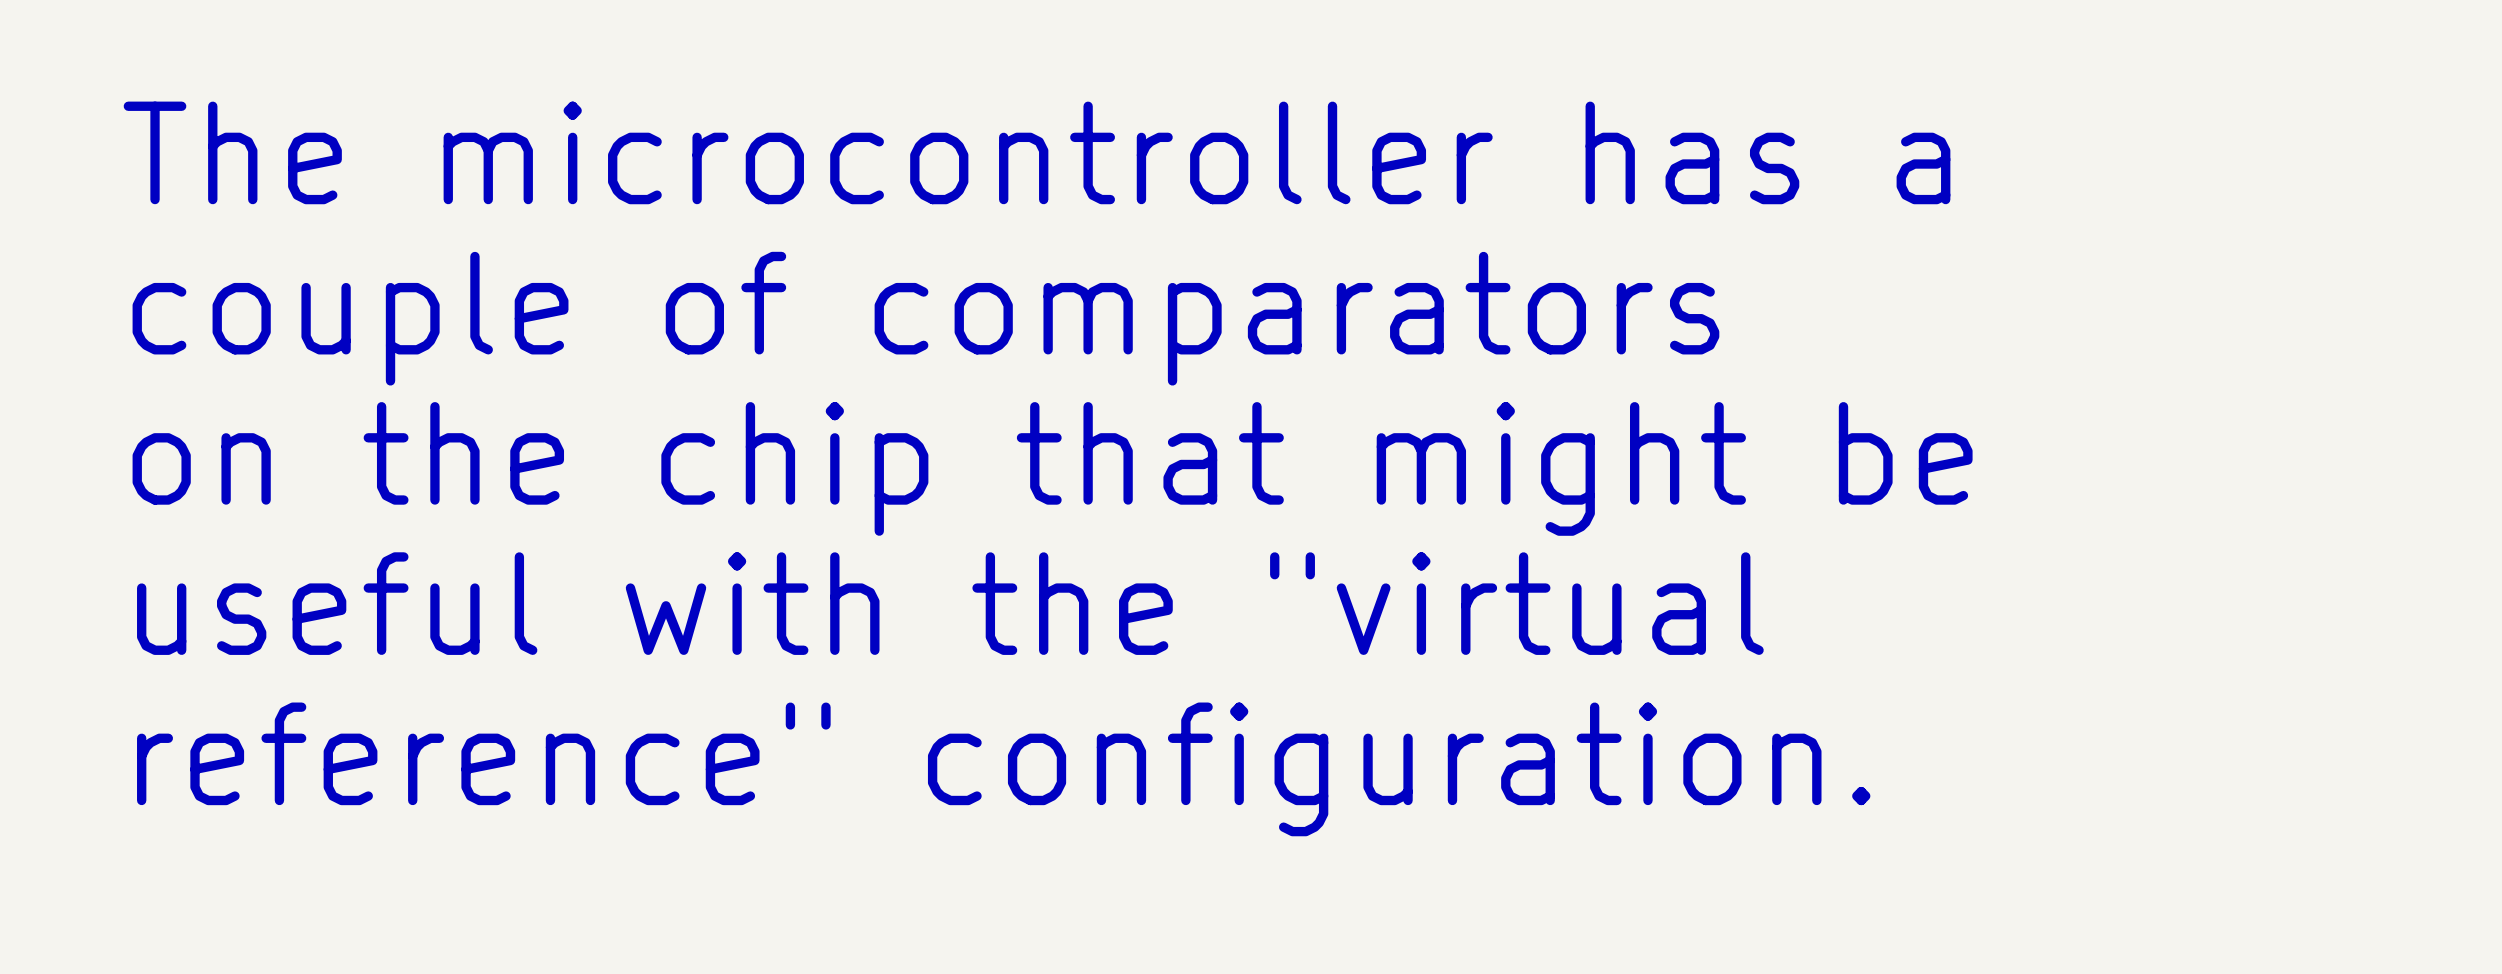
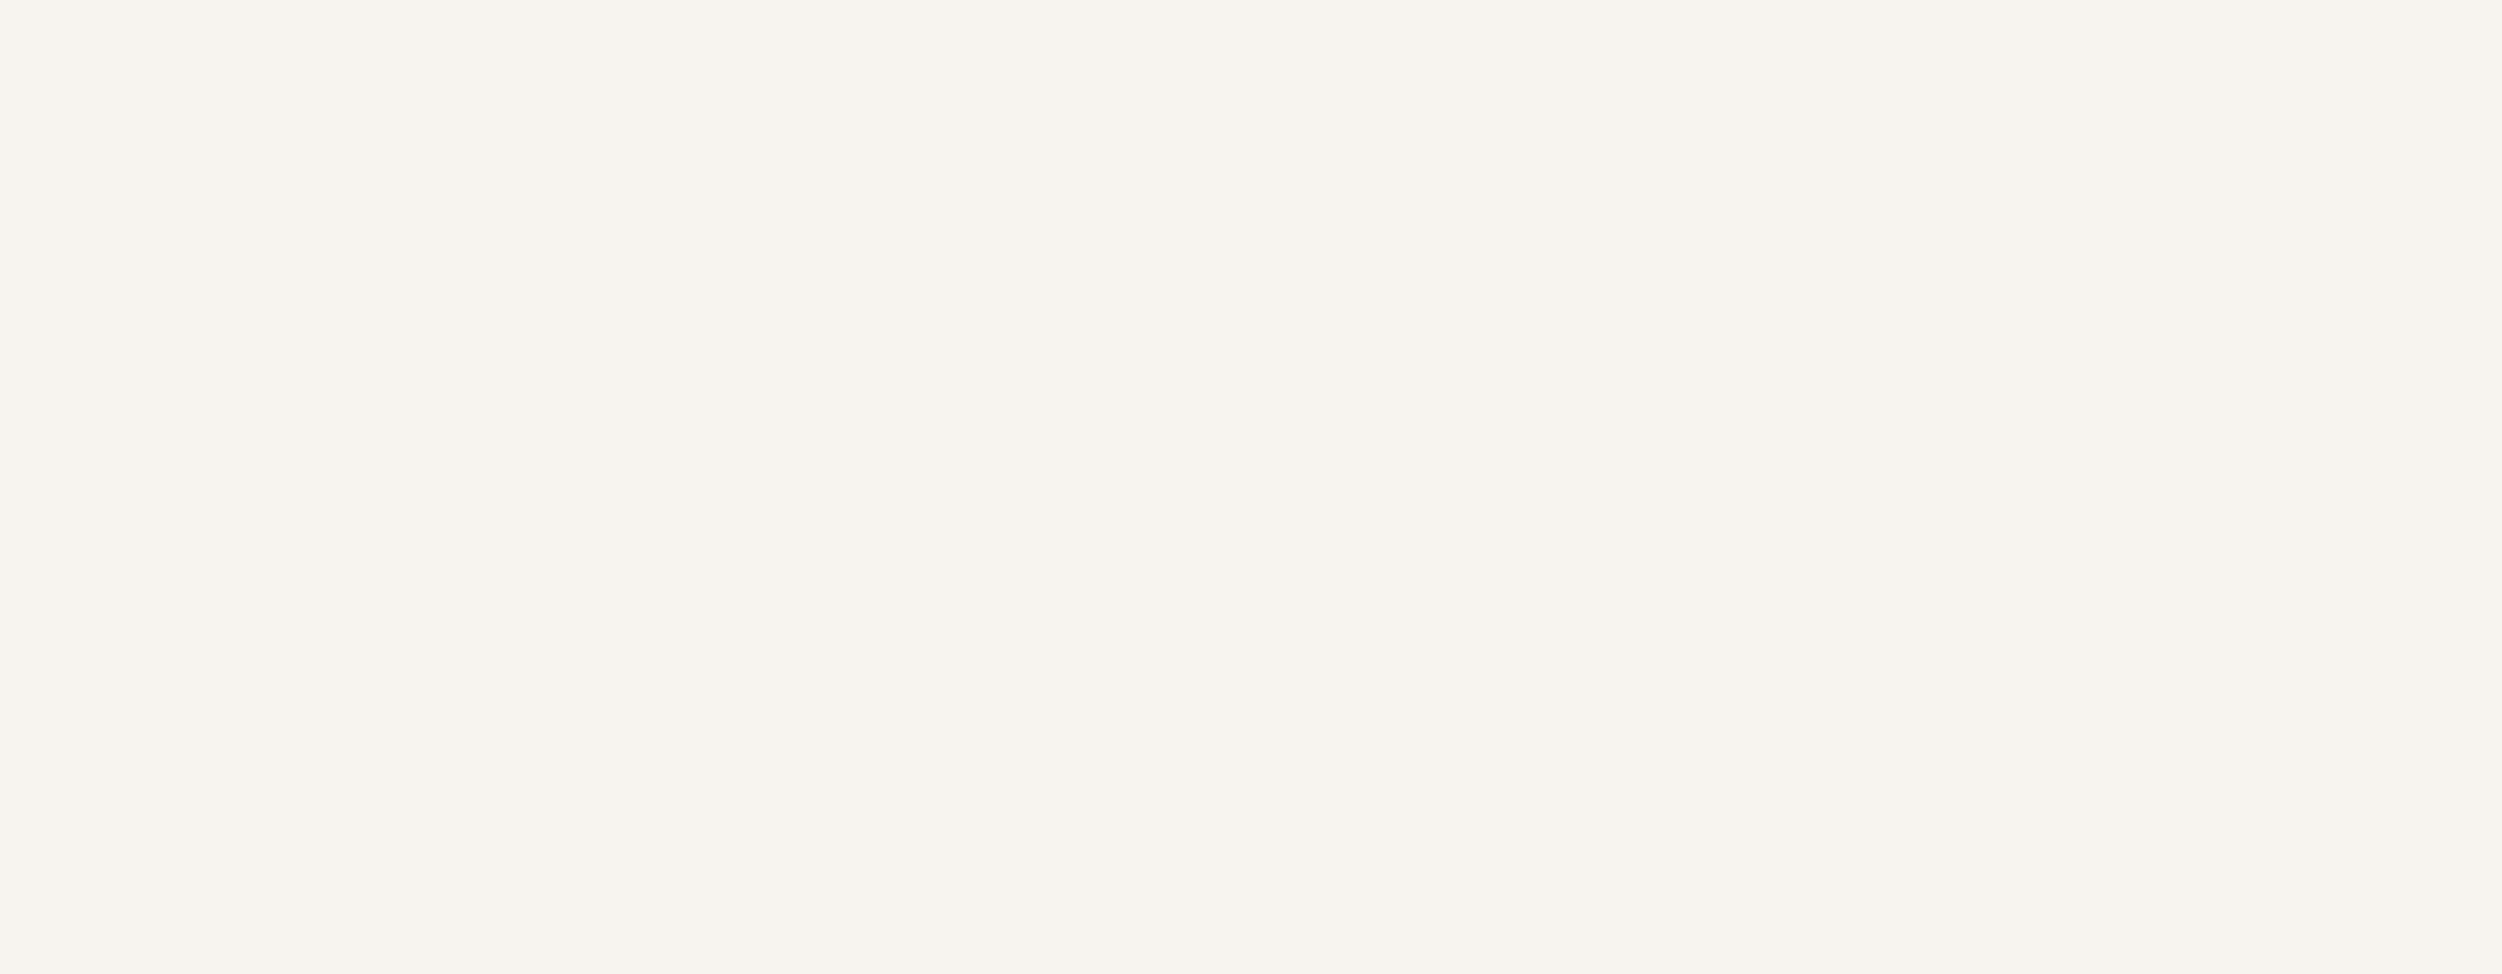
text: The microcontroller has a (1037, 152) -> none
text: couple of comparators (925, 318) -> none
text: on the chip that might be (1052, 468) -> none
text: useful with the "virtual (950, 603) -> none
text: reference" configuration. (1003, 769) -> none

